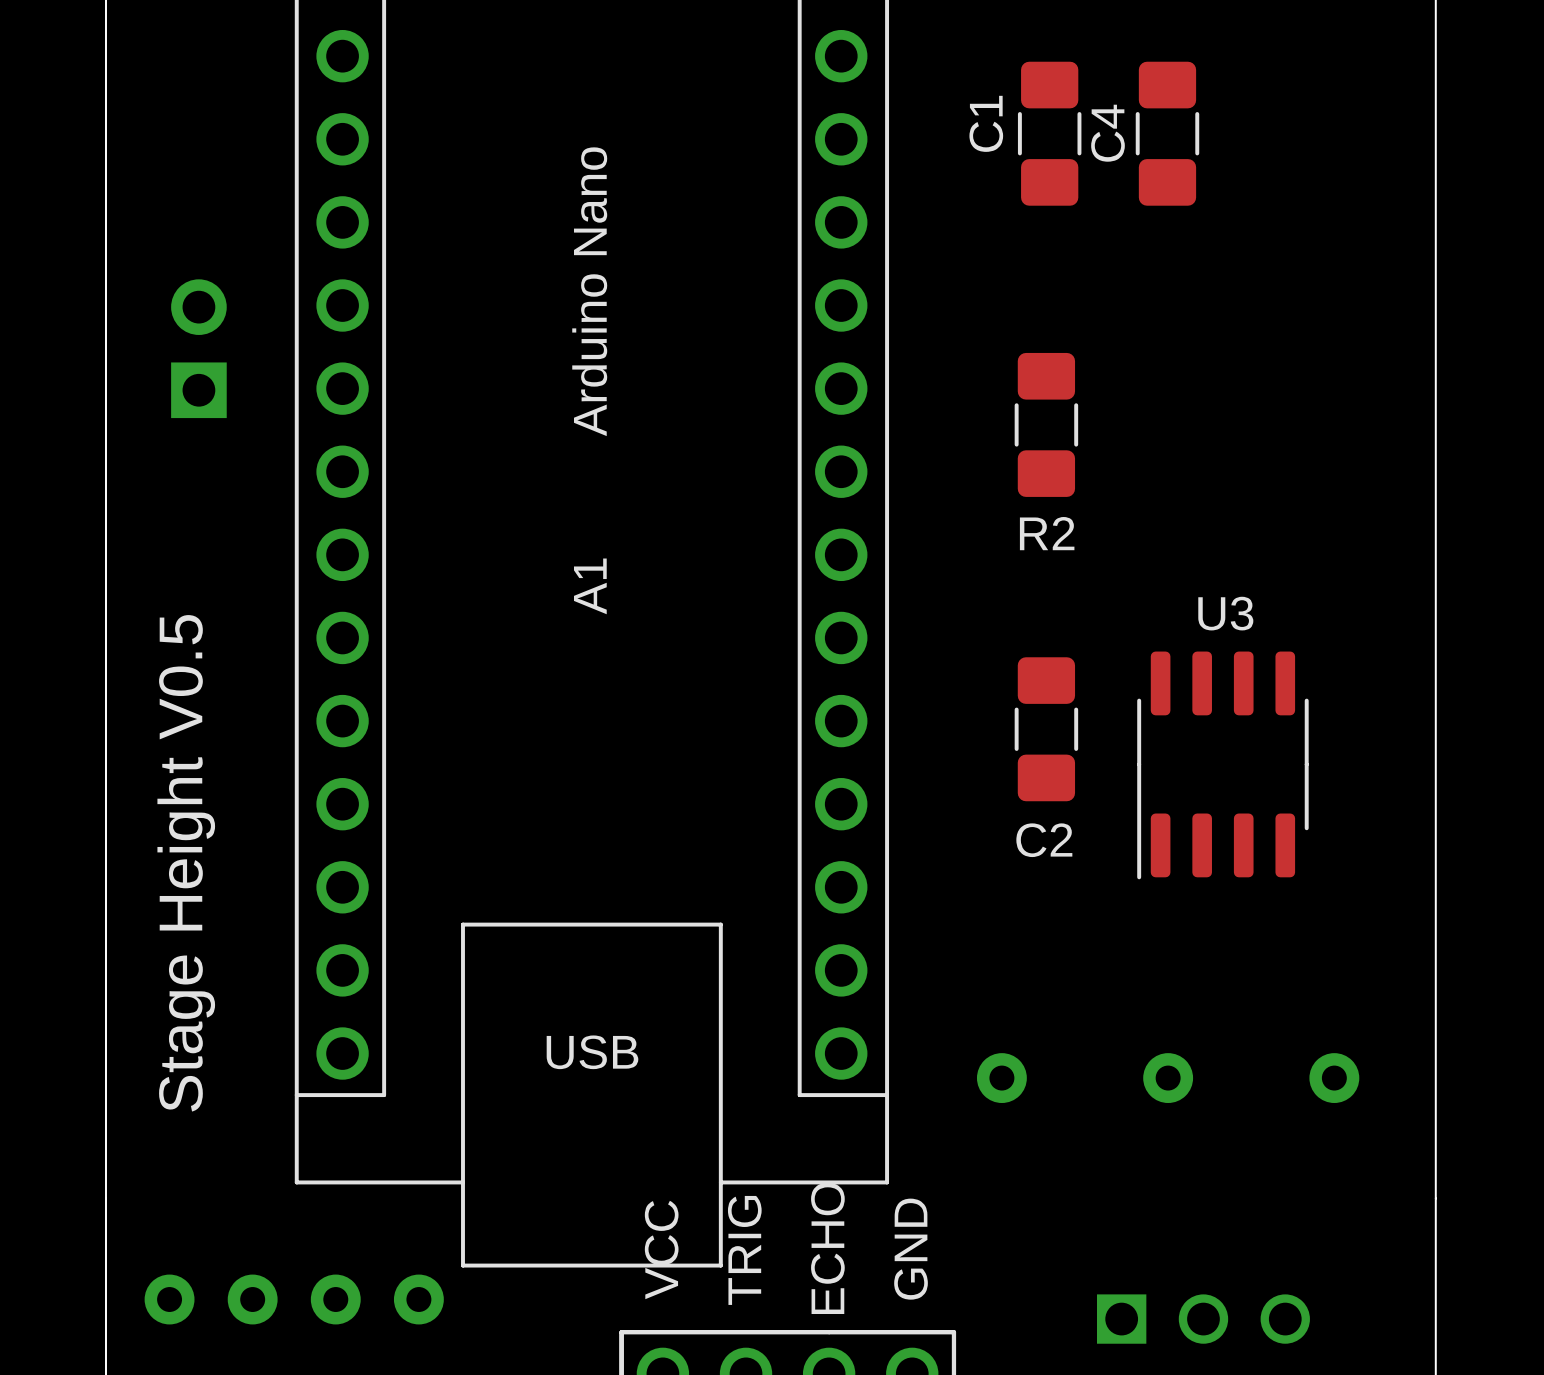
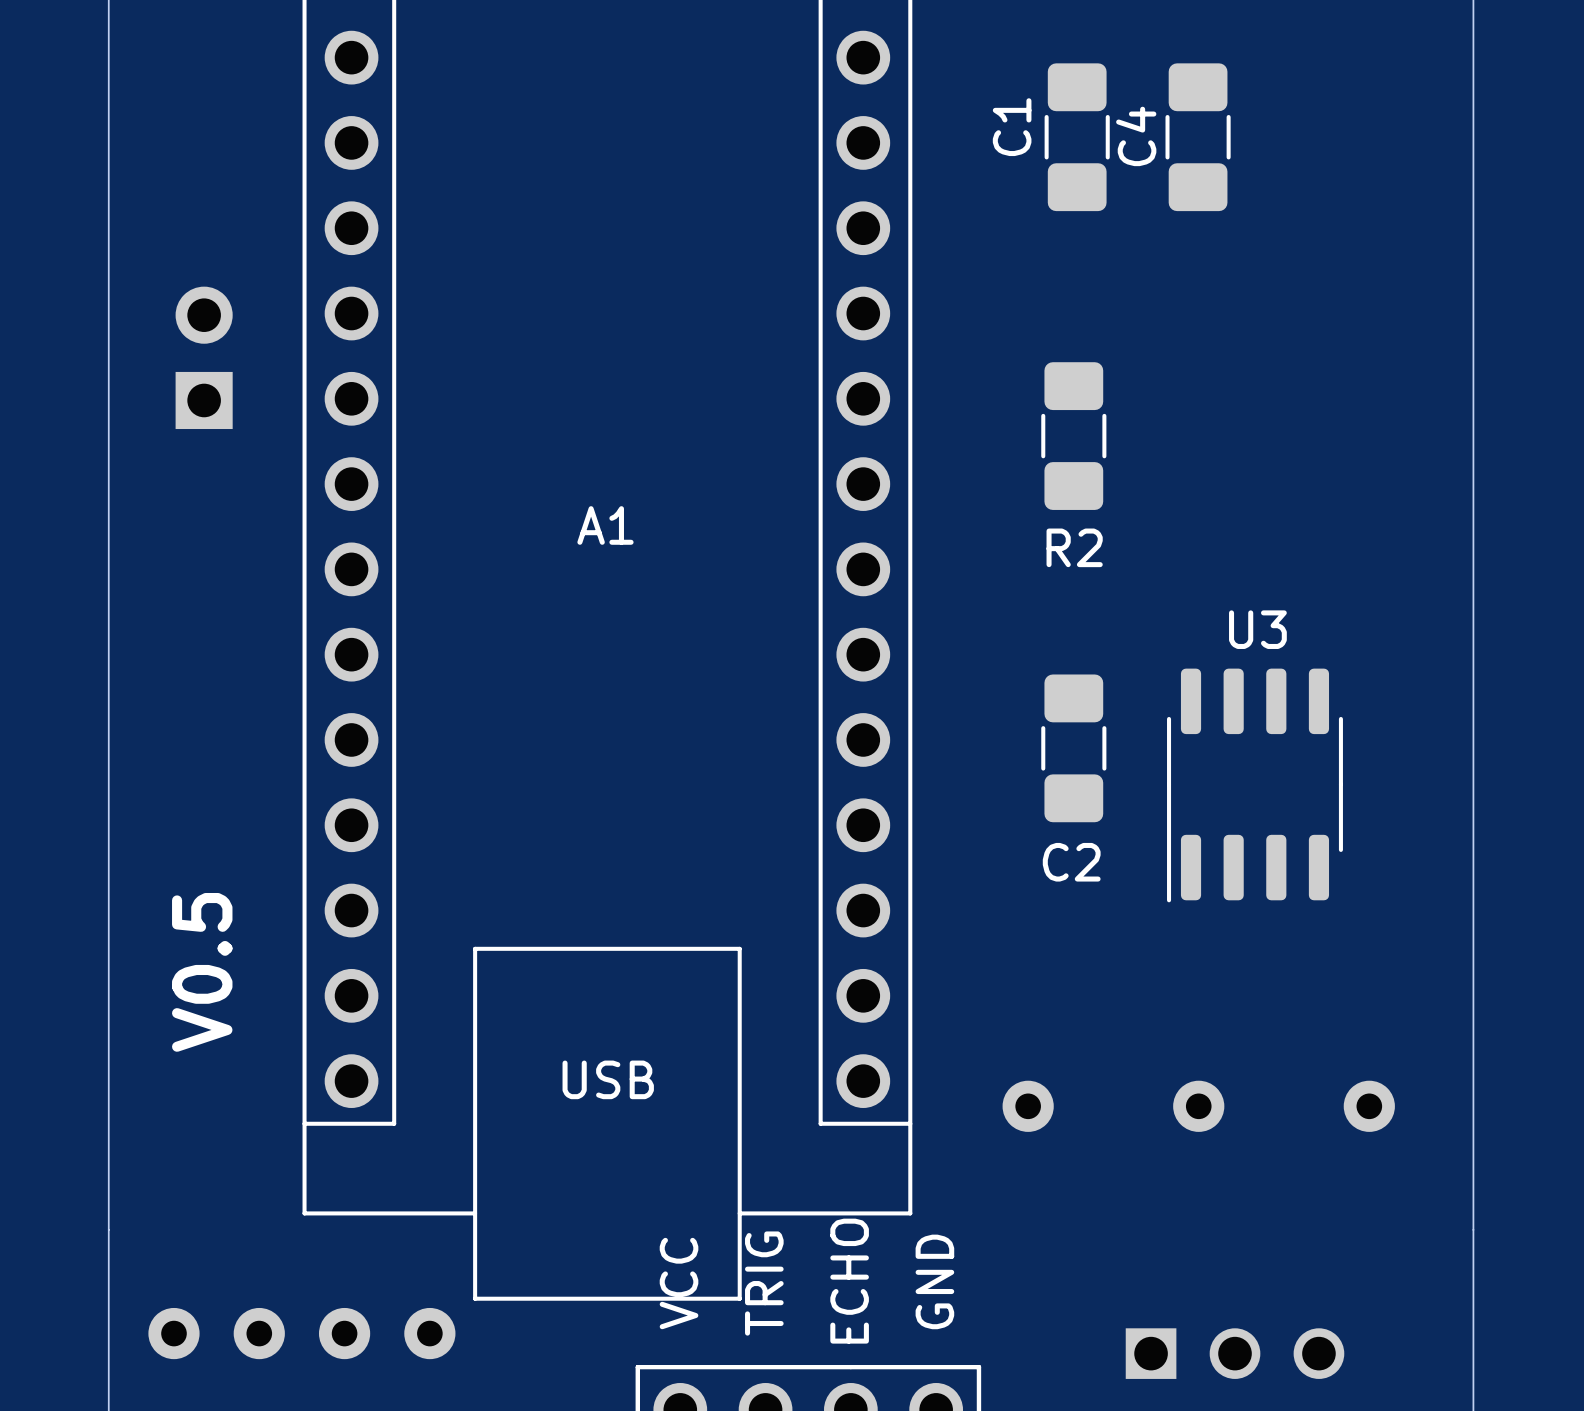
text: Arduino Nano (589, 291) -> none
A1 name rotation: 0° (590, 586) -> 90° clockwise (605, 525)
text: Stage Height V0.5 (186, 863) -> none
text: none -> V0.5 (202, 972)

